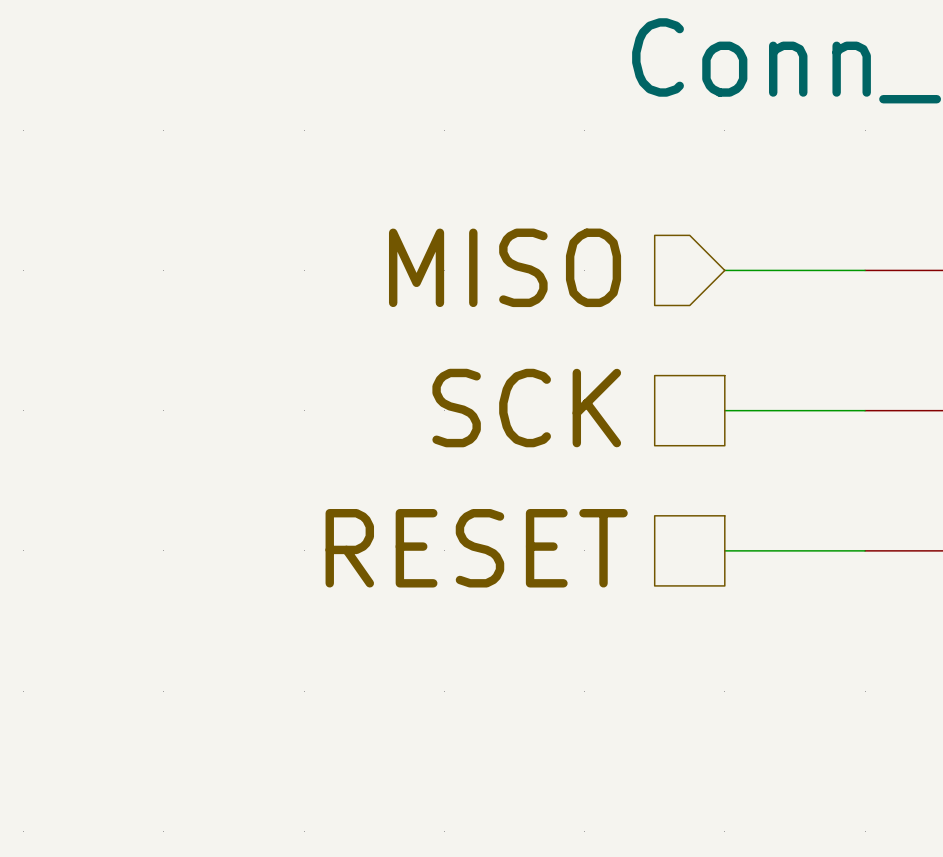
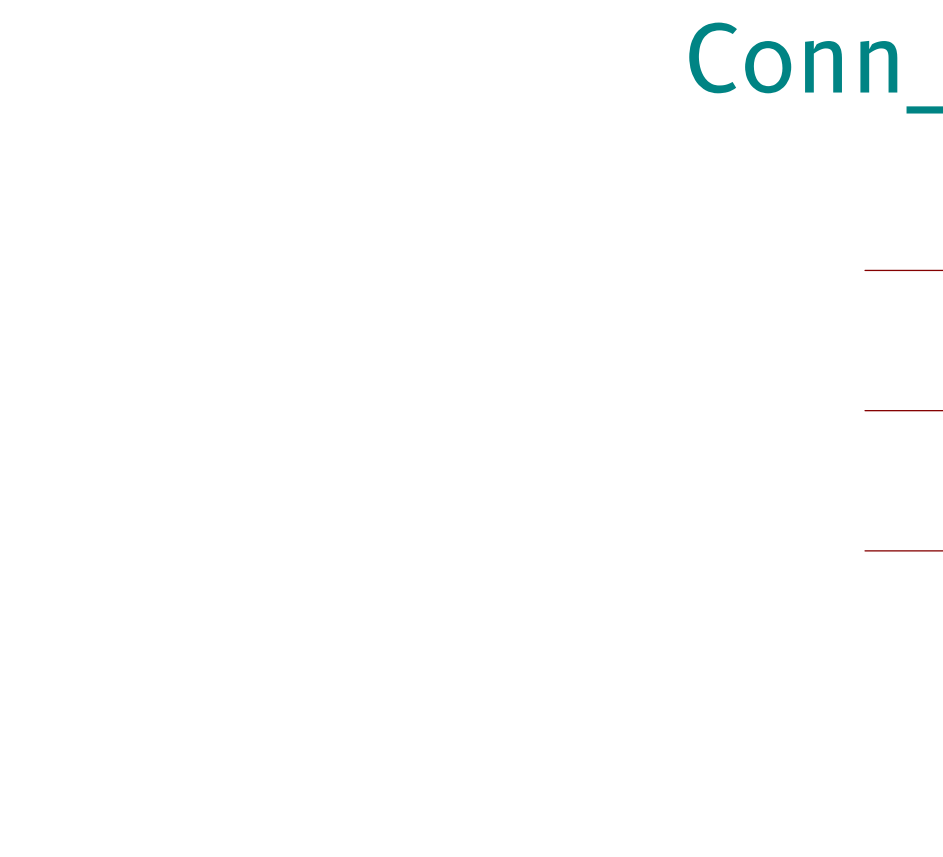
hierarchical label: MISO (505, 267) -> none
wire: (724, 270) (865, 270) -> none
hierarchical label: SCK (526, 408) -> none
wire: (724, 410) (865, 410) -> none
hierarchical label: RESET (476, 548) -> none
wire: (724, 550) (865, 550) -> none

